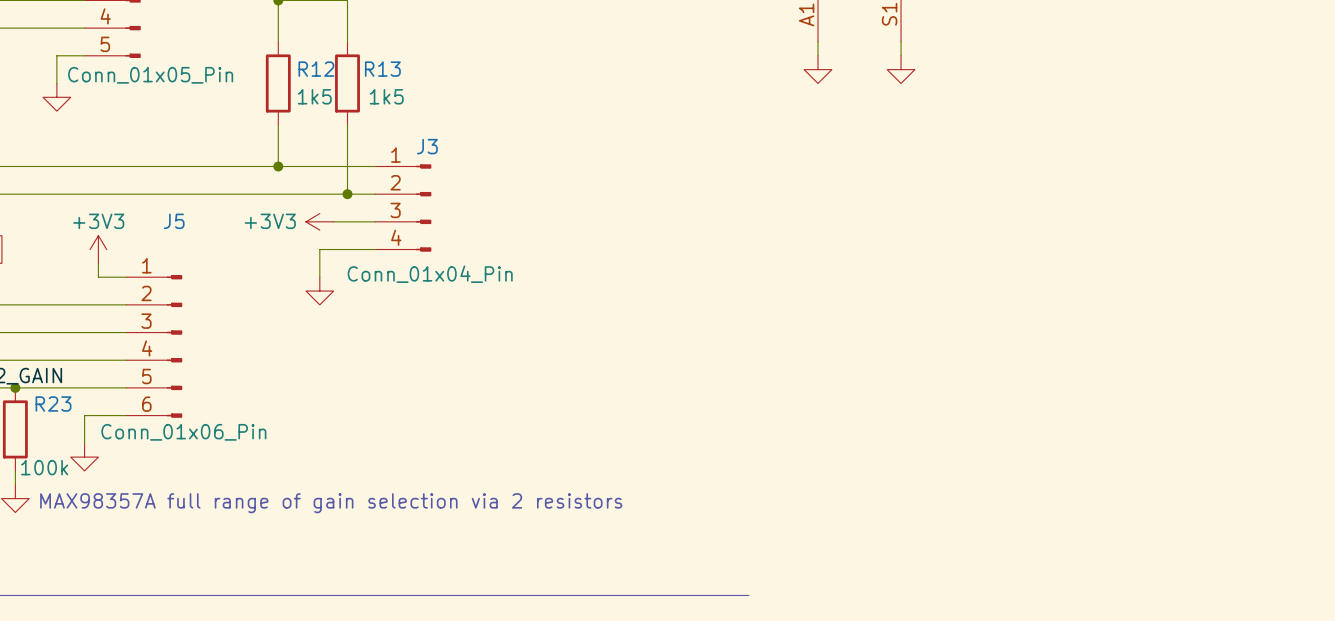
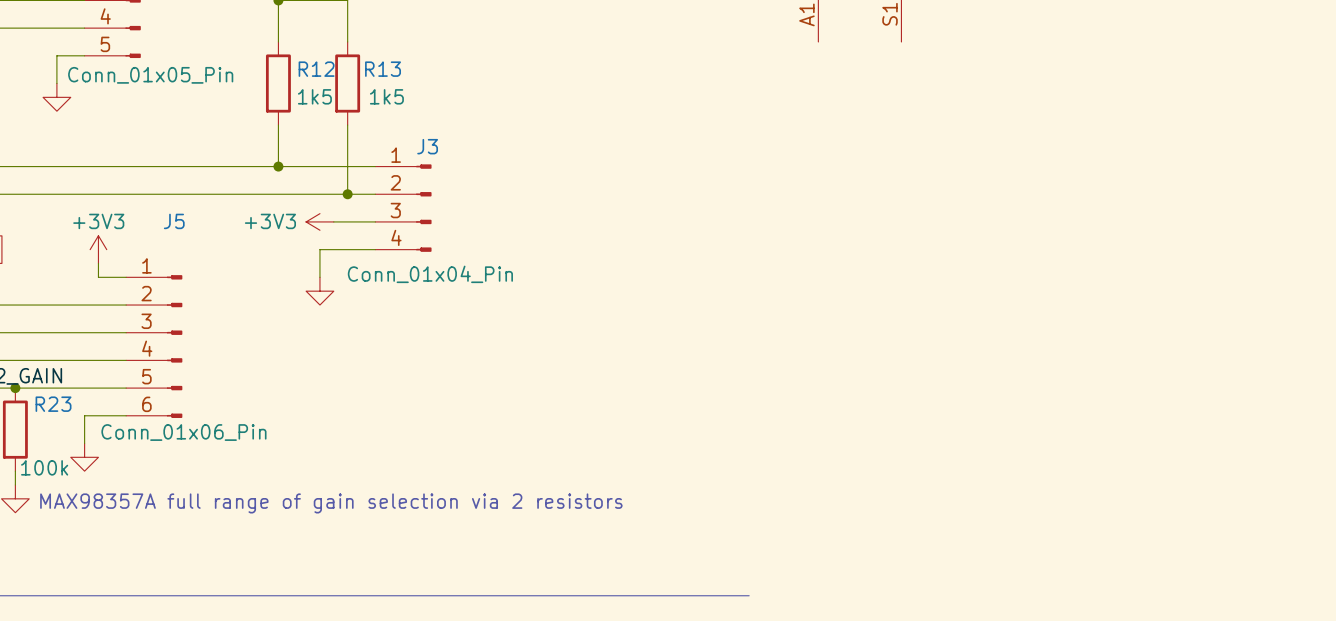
wire: (817, 41) (817, 55) -> none
wire: (901, 41) (901, 55) -> none
power symbol: (817, 69) -> none
power symbol: (901, 69) -> none

